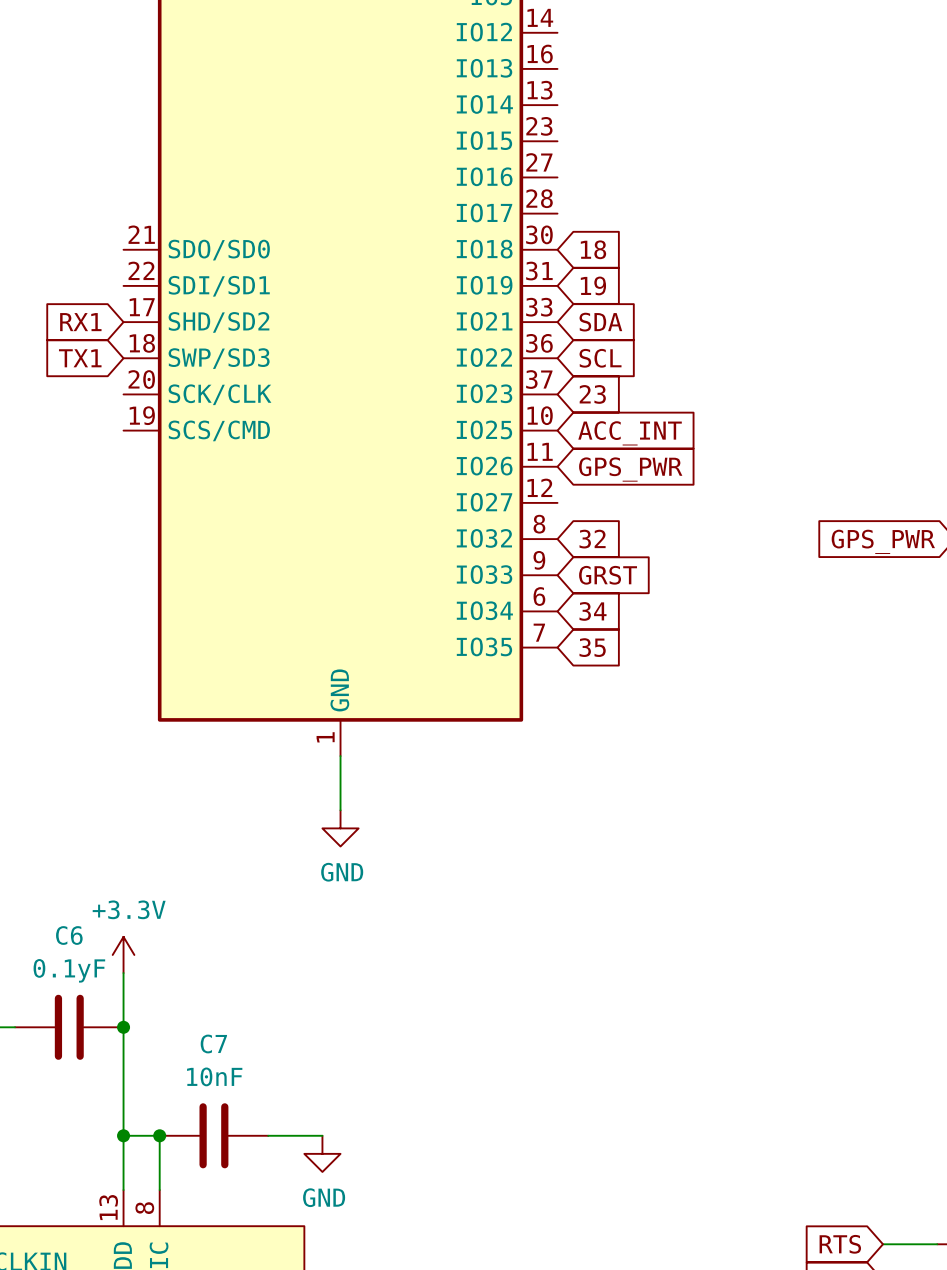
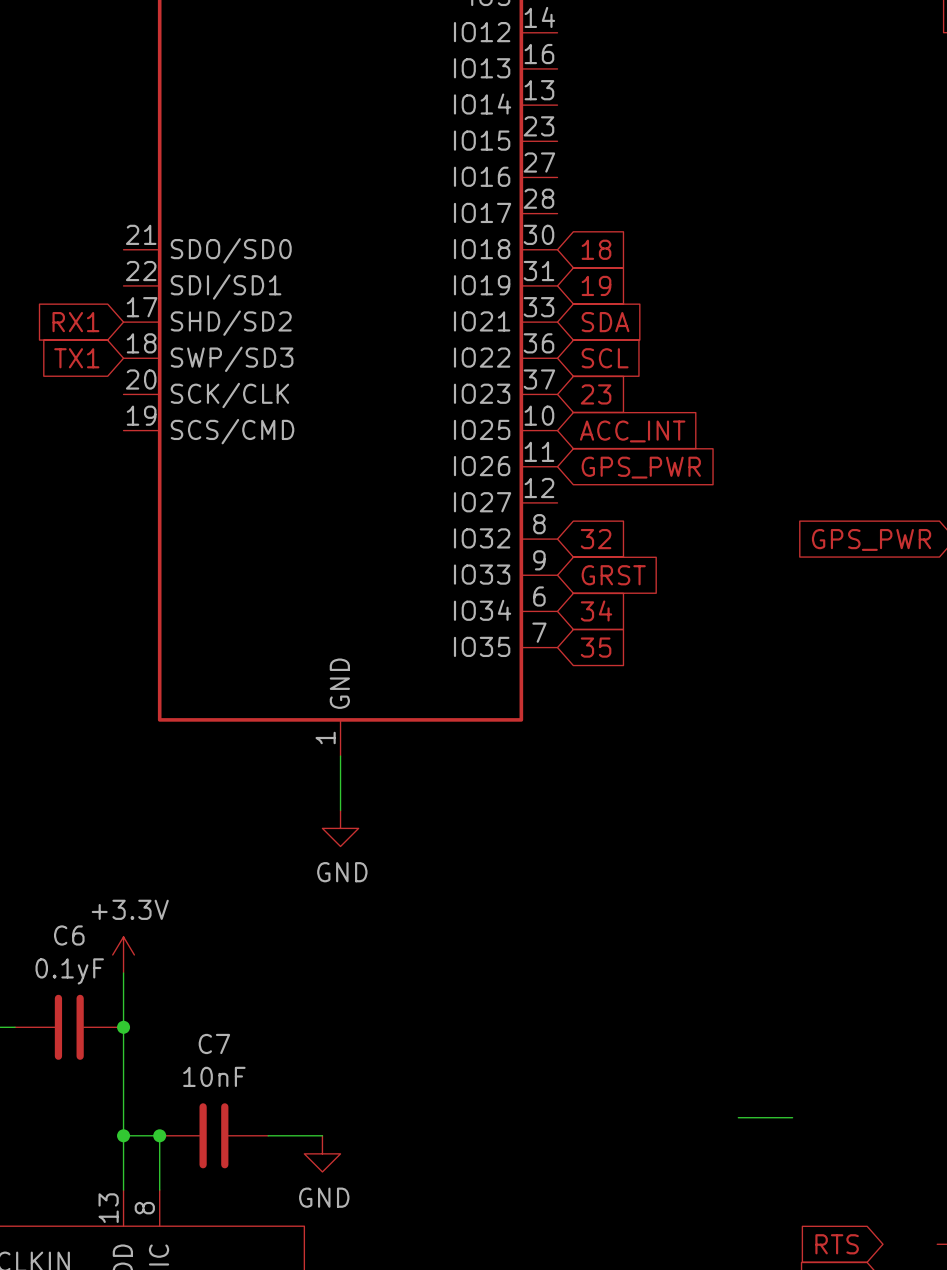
wire: (882, 1244) (937, 1244) -> (738, 1117) (792, 1117)

